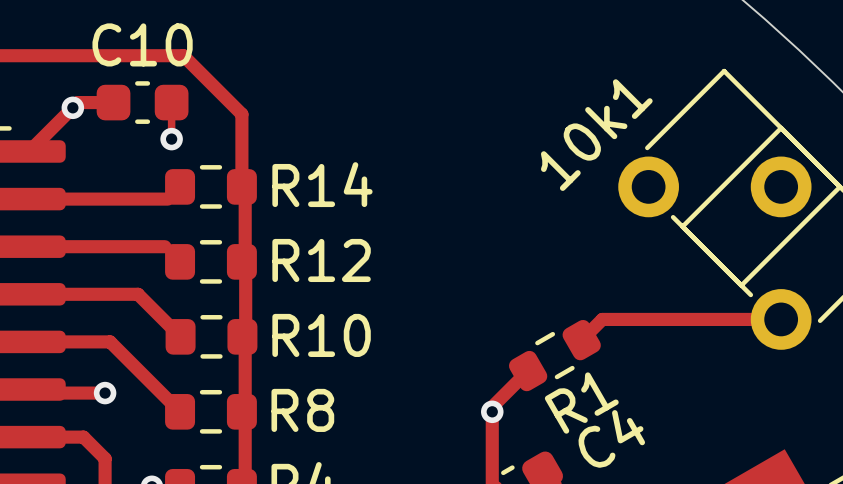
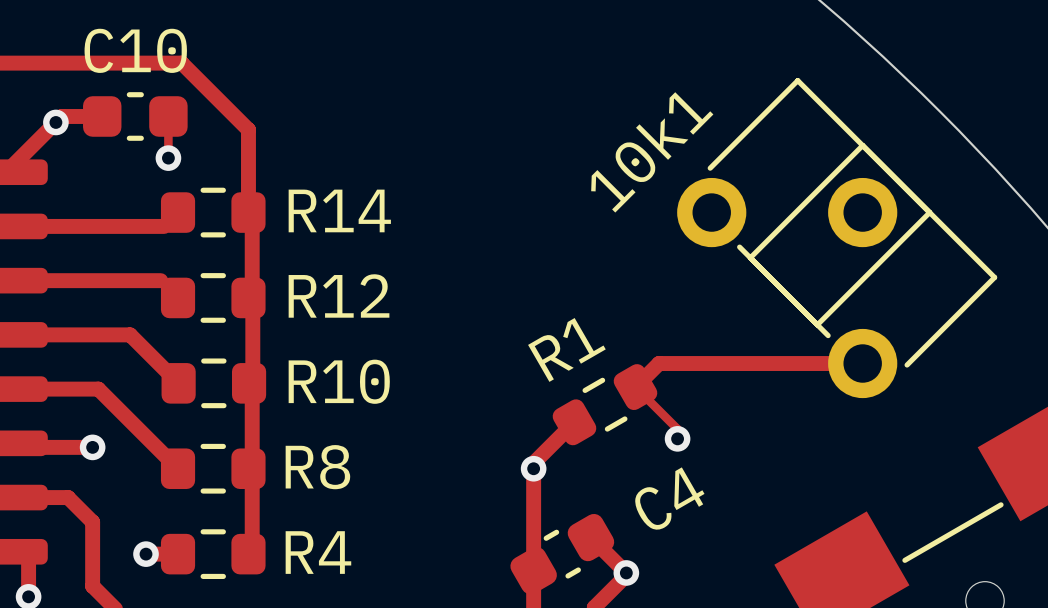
track: none -> (635, 387) (677, 429) (677, 438)
via: none -> (677, 438)
R1 name position: R1 (581, 403) -> R1 (566, 349)

